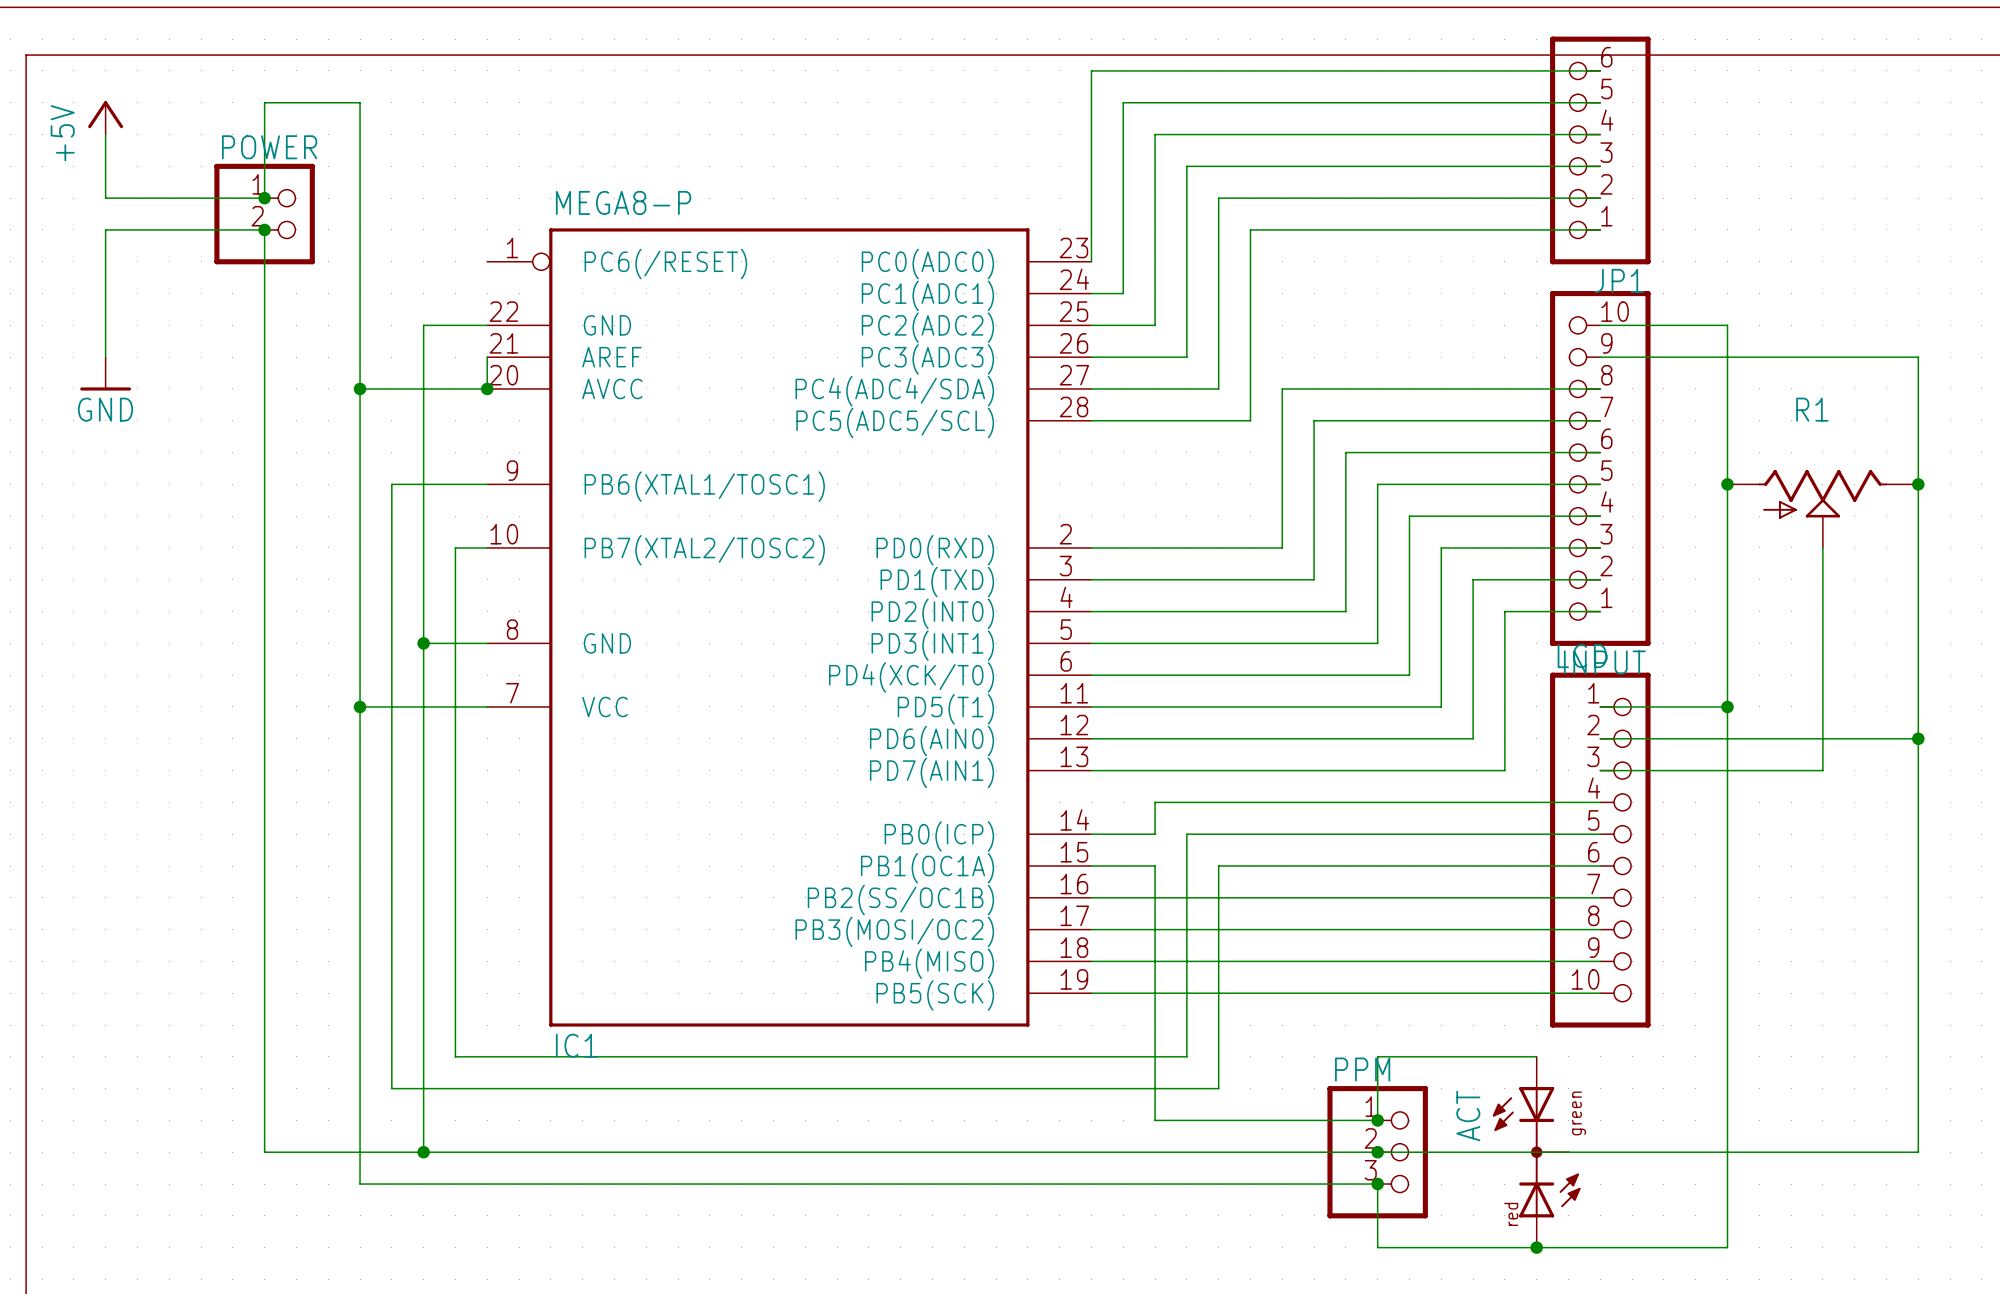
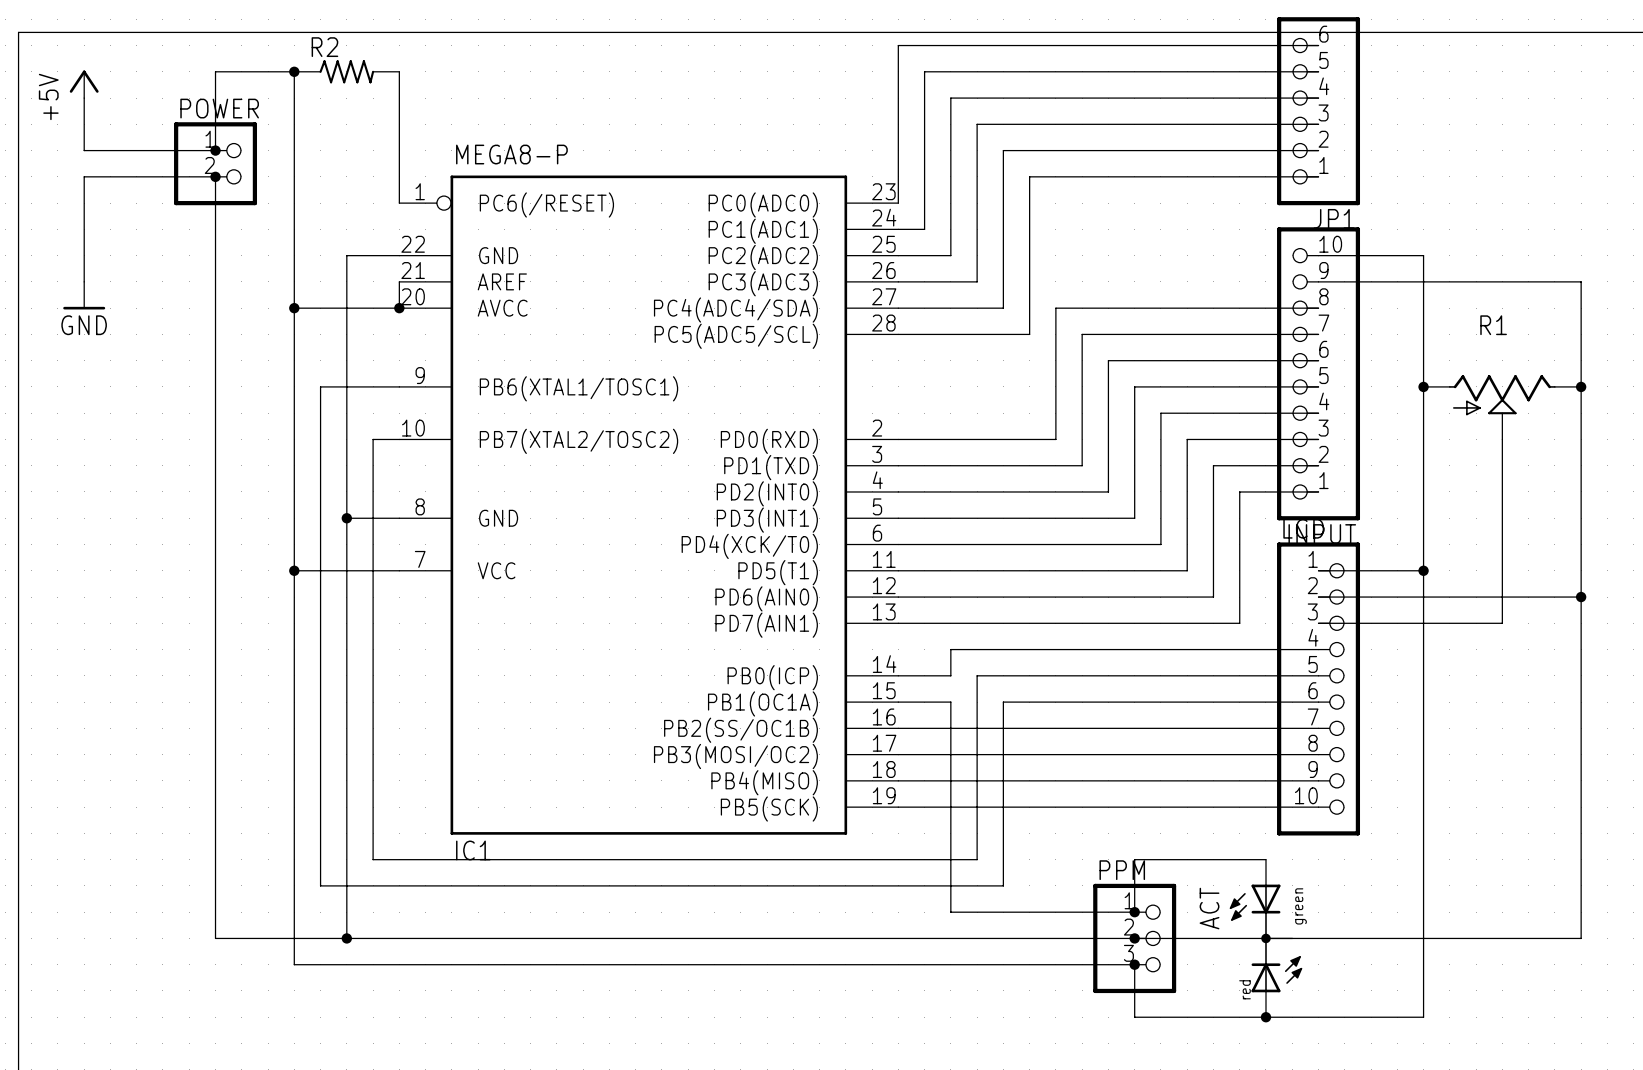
junction: none -> (294, 71)
R2: none -> (346, 71)
wire: none -> (399, 71) (399, 203)

